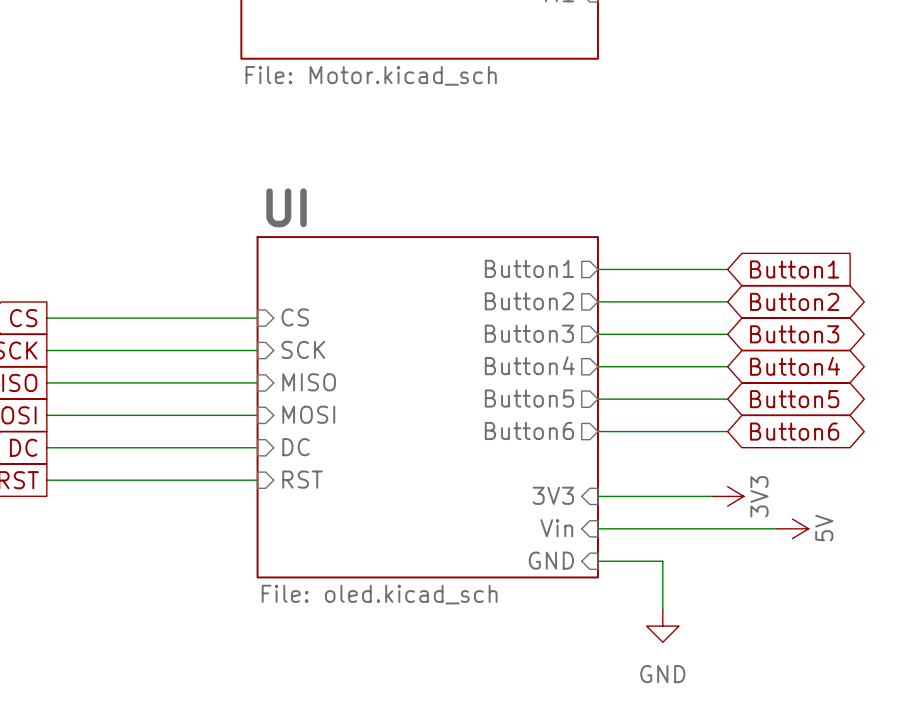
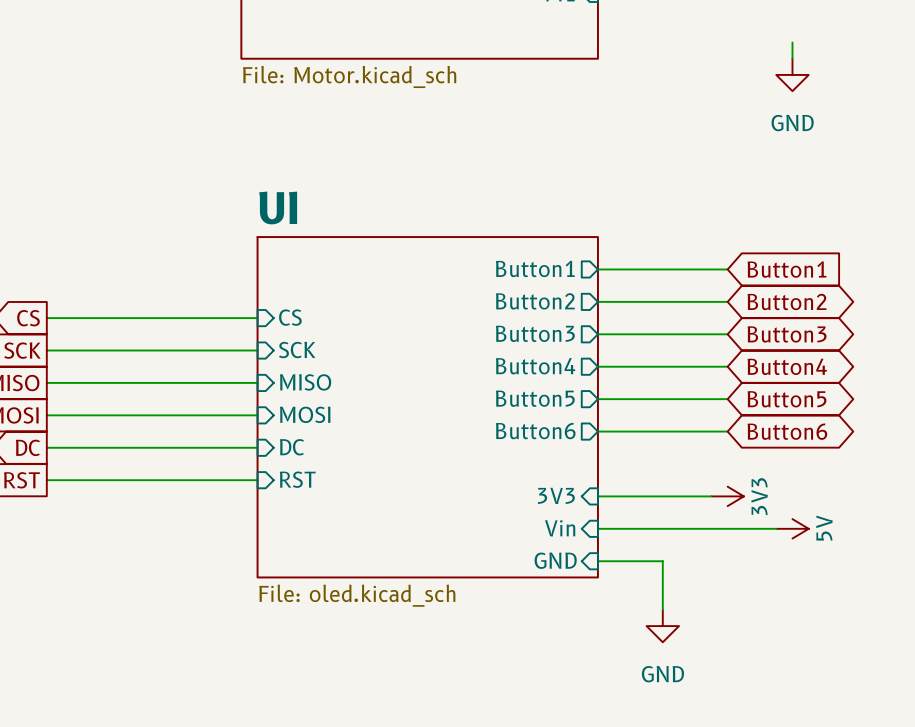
wire: none -> (792, 42) (792, 58)
power symbol: none -> GND (792, 74)

